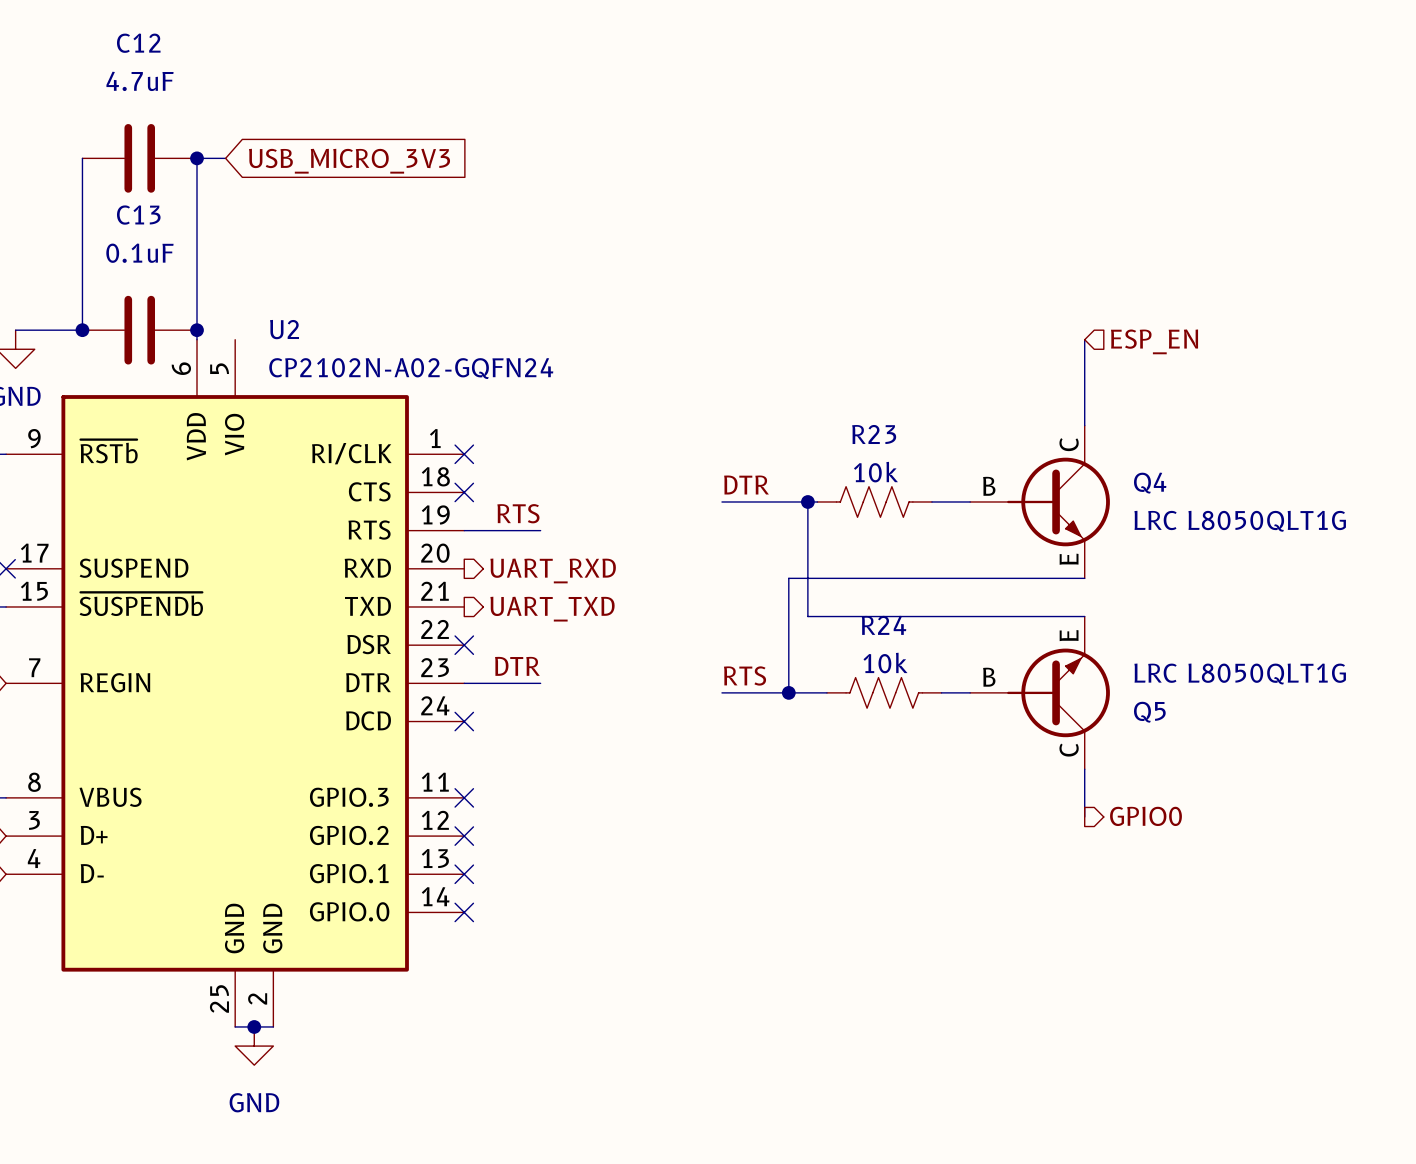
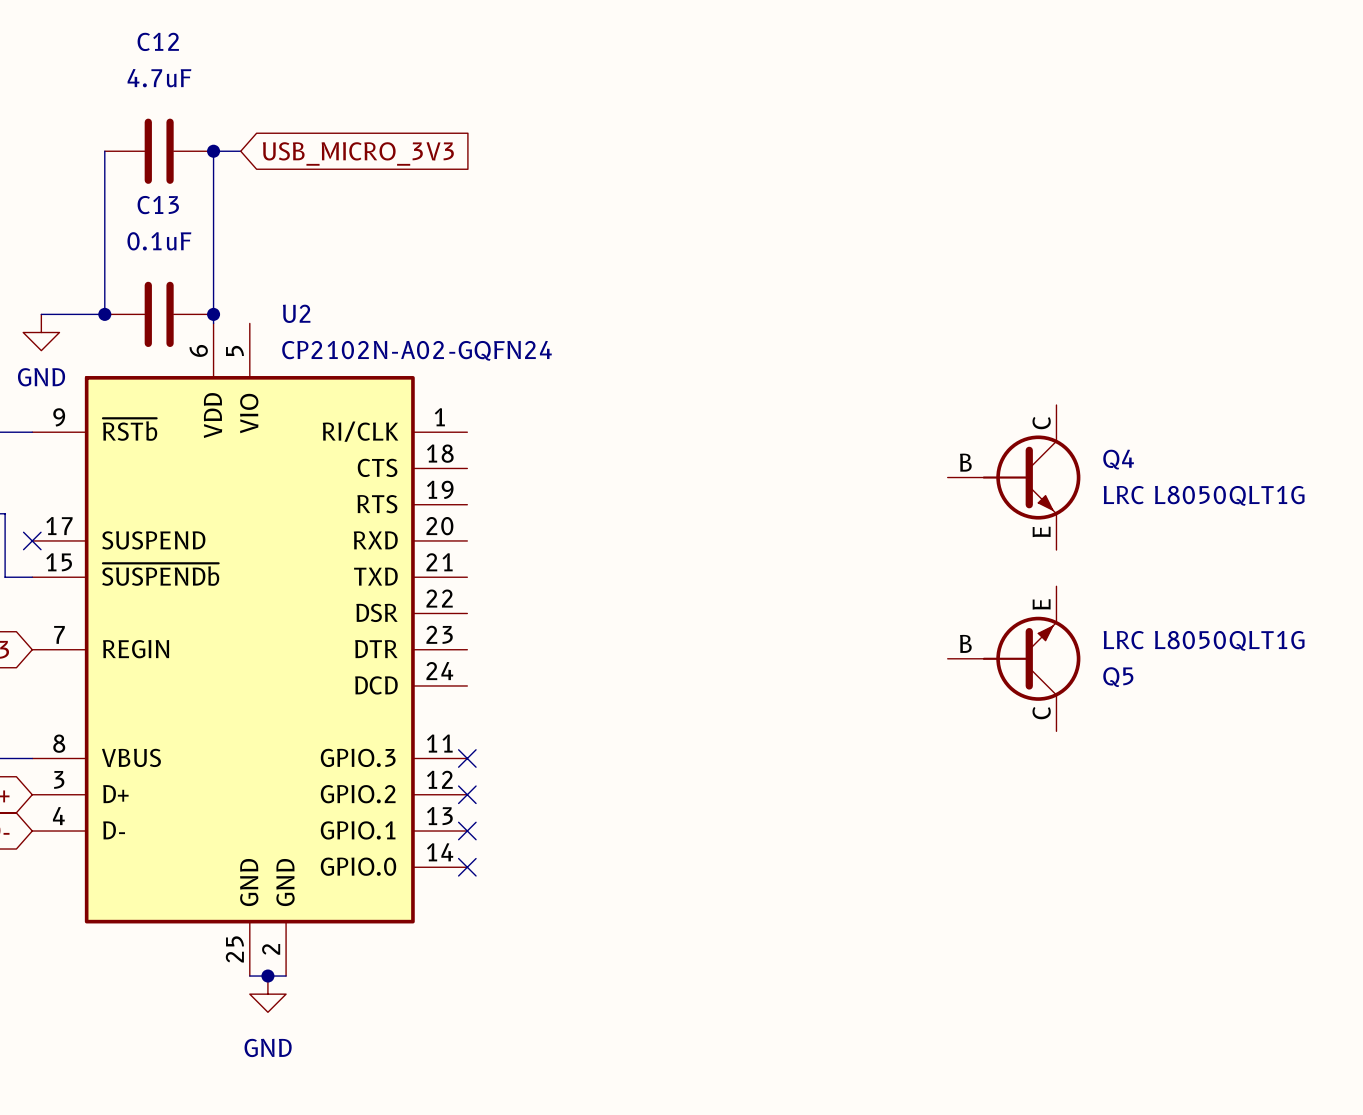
wire: (1084, 339) (1084, 425) -> none
hierarchical label: ESP_EN (1154, 341) -> none
no-connect mark: (464, 454) -> none
label: DTR (746, 485) -> none
no-connect mark: (464, 492) -> none
wire: (721, 501) (817, 501) -> none
wire: (807, 501) (807, 616) (1084, 616) -> none
junction: (807, 501) -> none
R23: 10k (874, 501) -> none
wire: (931, 501) (970, 501) -> none
label: RTS (518, 513) -> none
wire: (464, 530) (540, 530) -> none
hierarchical label: UART_RXD (553, 570) -> none
wire: (1084, 578) (788, 578) (788, 692) -> none
hierarchical label: UART_TXD (552, 609) -> none
no-connect mark: (464, 645) -> none
label: DTR (517, 666) -> none
label: RTS (744, 675) -> none
wire: (464, 683) (540, 683) -> none
wire: (721, 692) (826, 692) -> none
junction: (788, 692) -> none
R24: 10k (884, 692) -> none
wire: (941, 692) (970, 692) -> none
no-connect mark: (464, 721) -> none
wire: (1084, 769) (1084, 816) -> none
hierarchical label: GPIO0 (1145, 816) -> none

